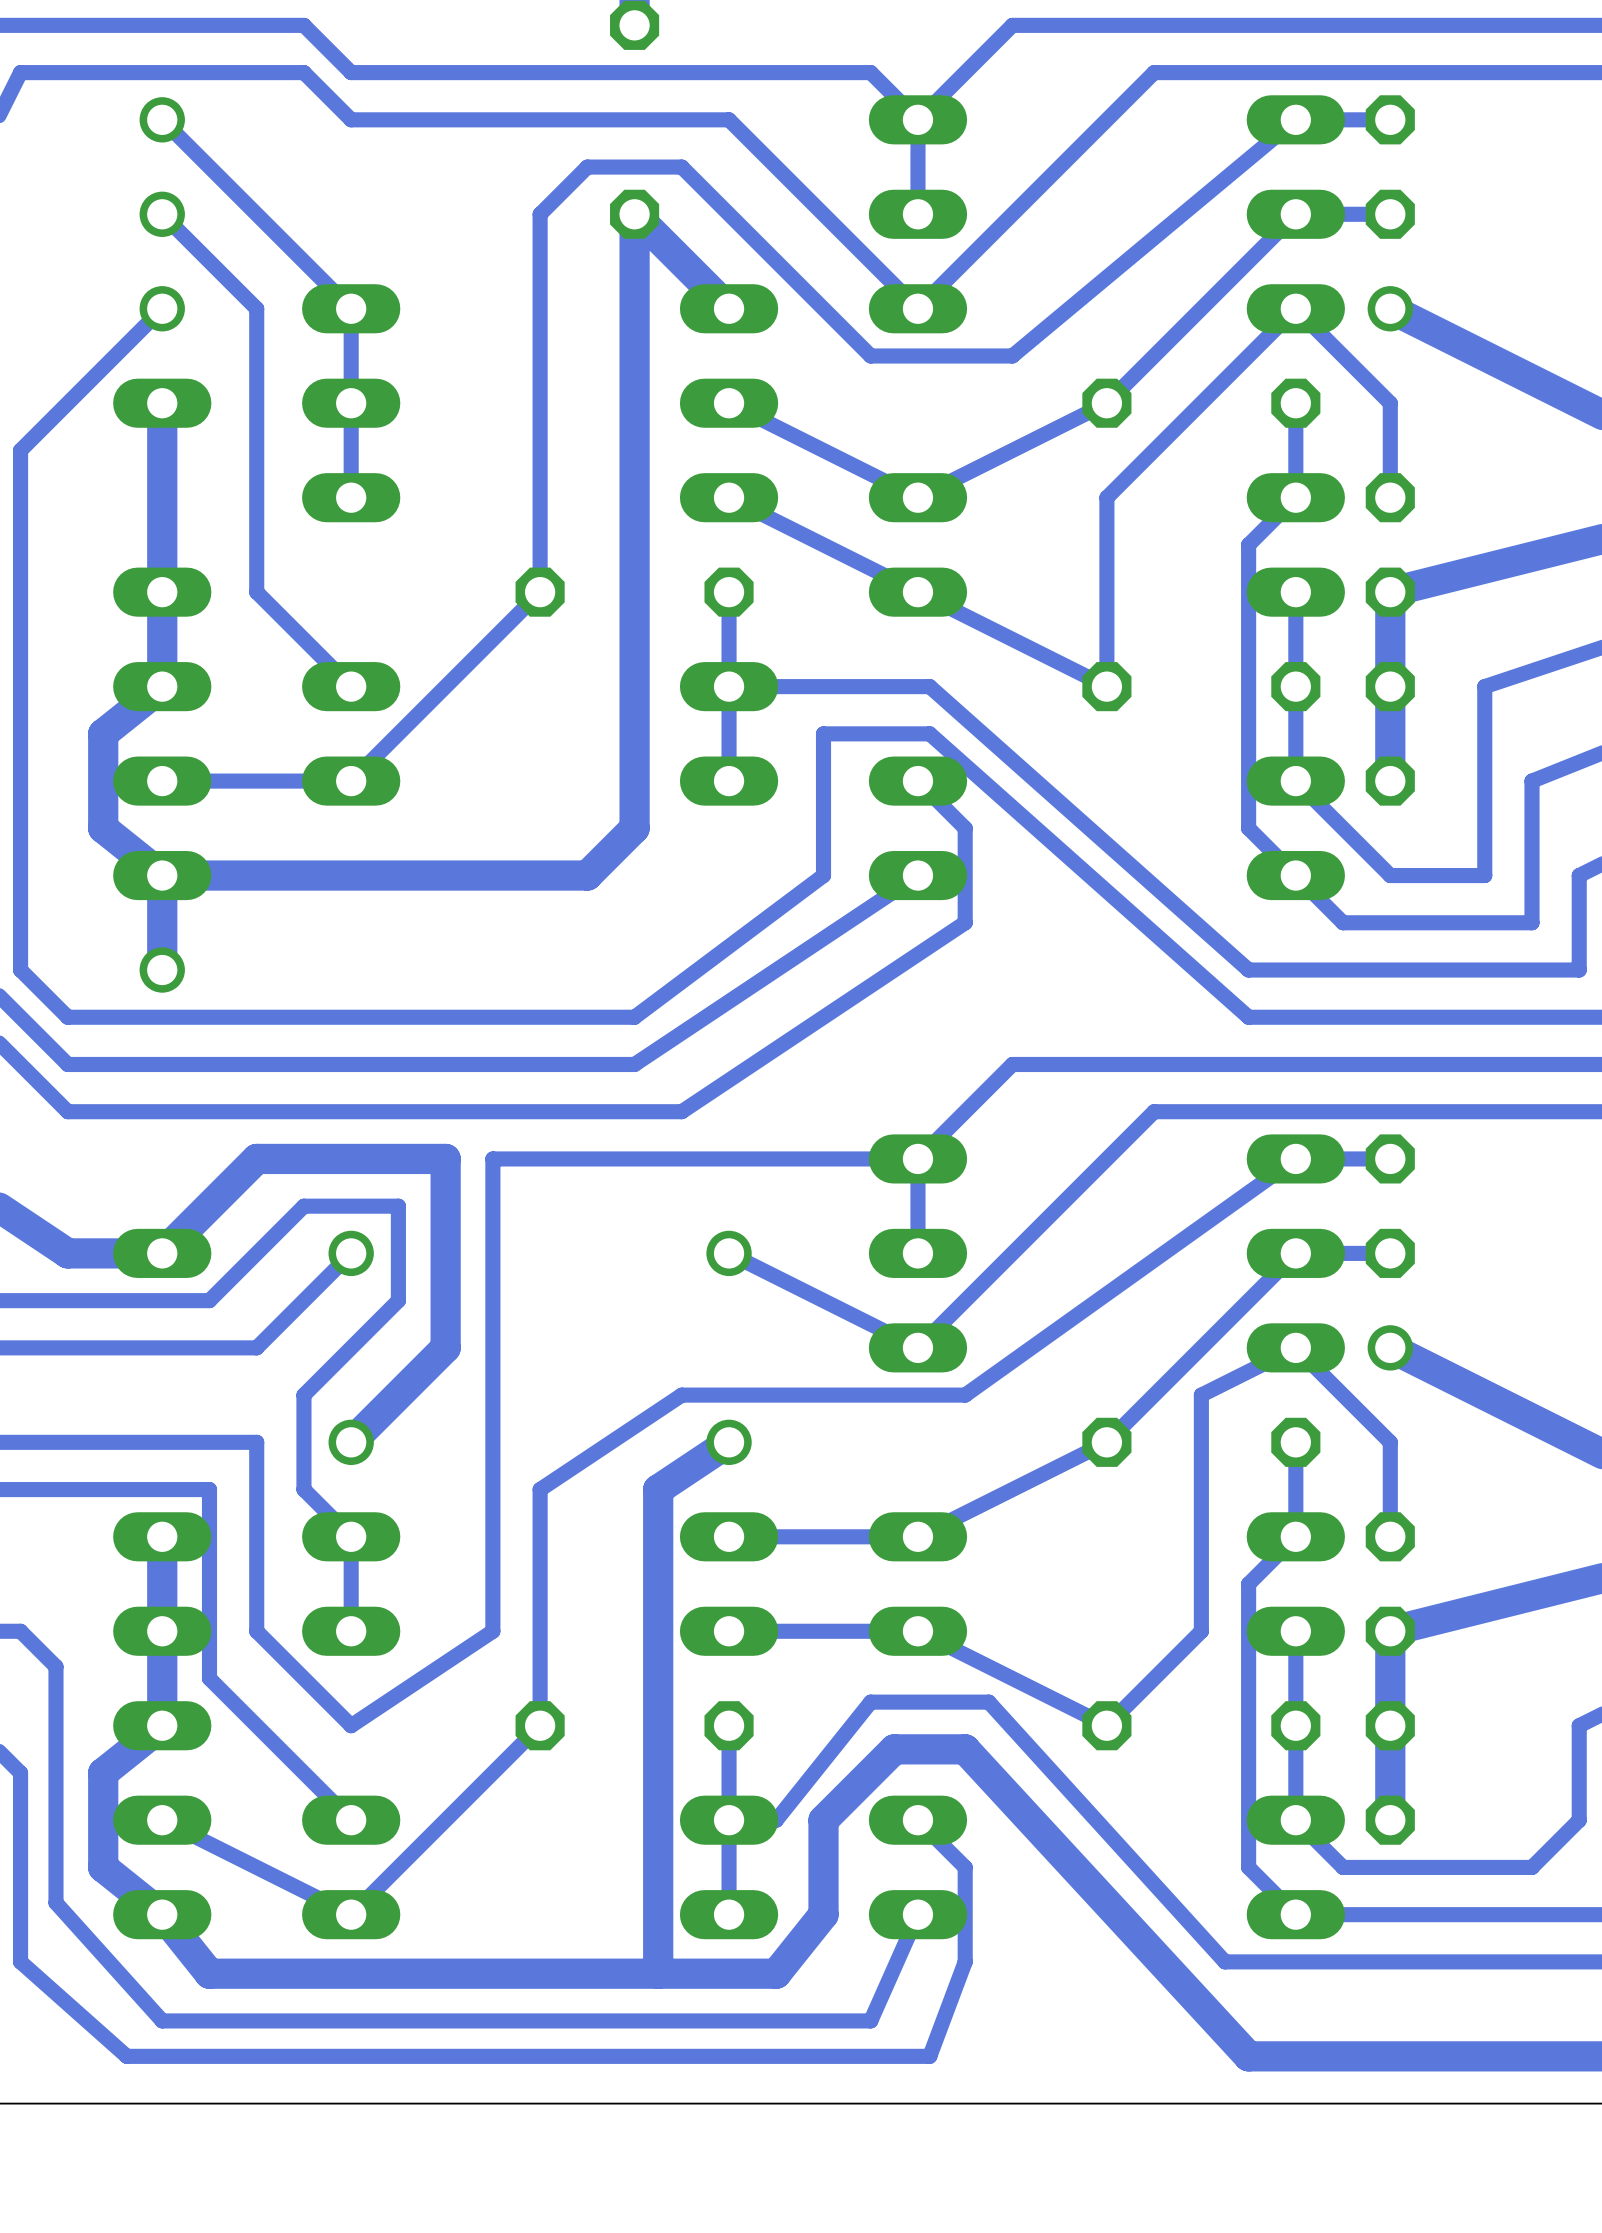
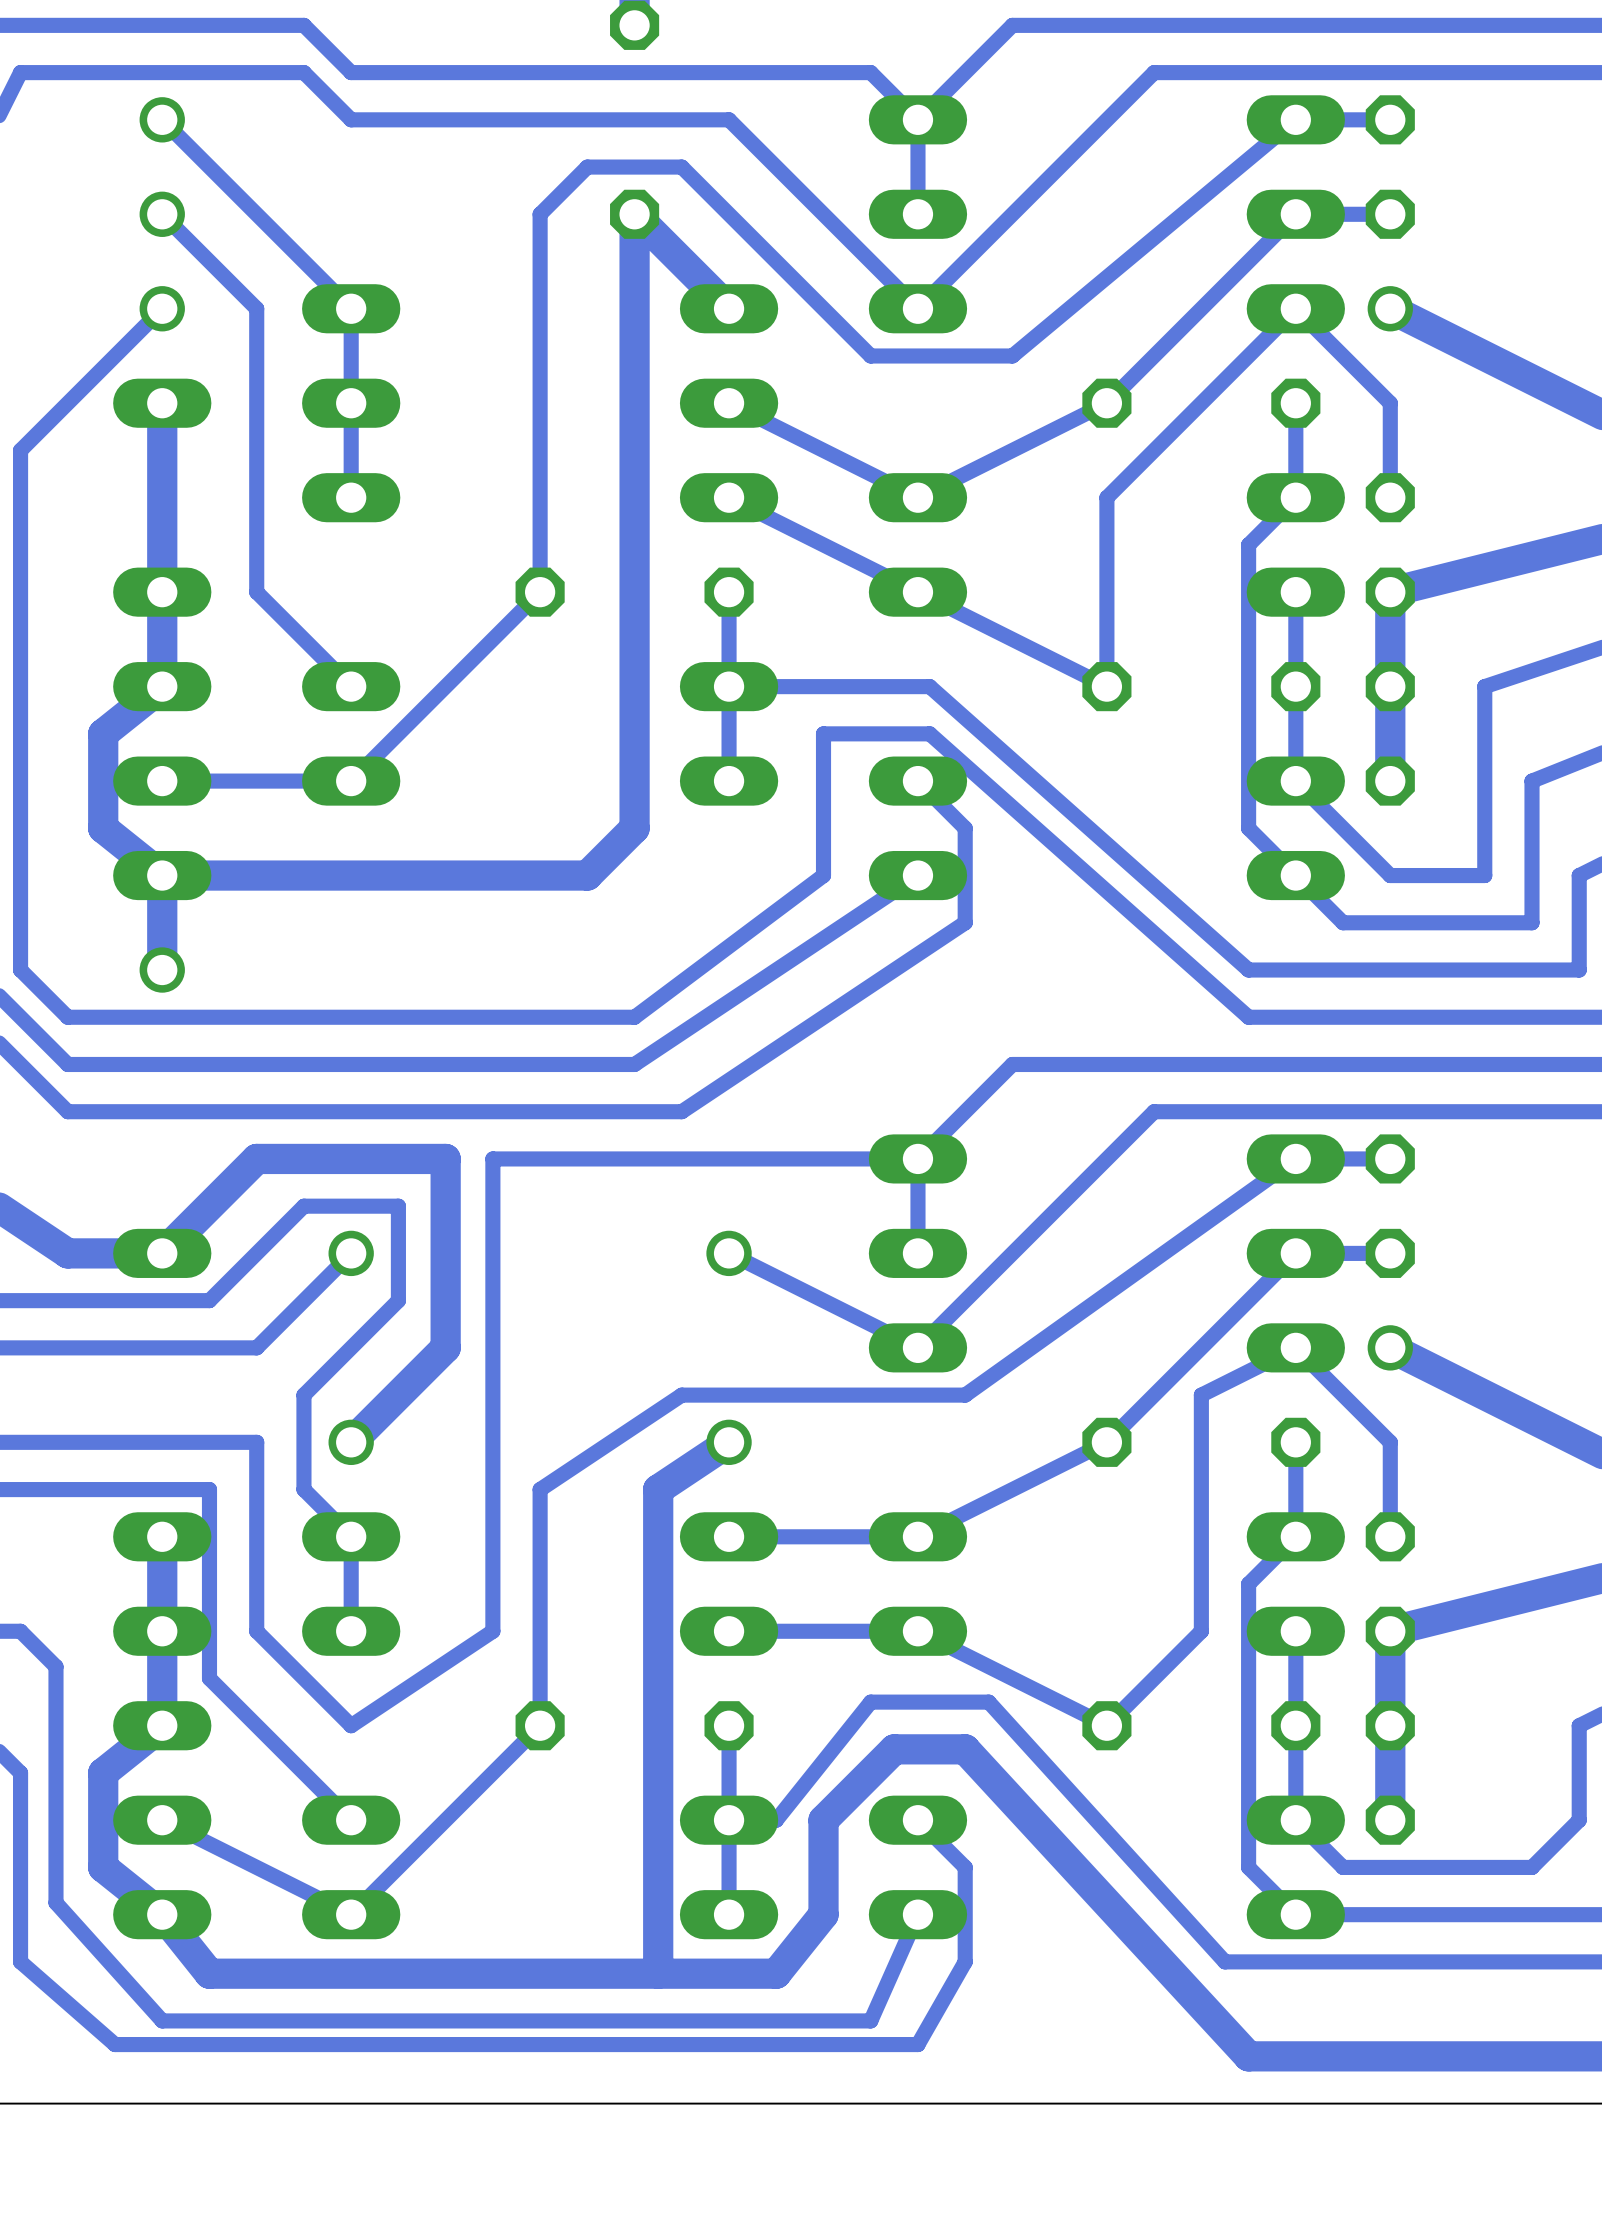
track: (965, 1961) (929, 2056) (126, 2056) (20, 1961) -> (965, 1961) (917, 2044) (115, 2044) (20, 1961)

